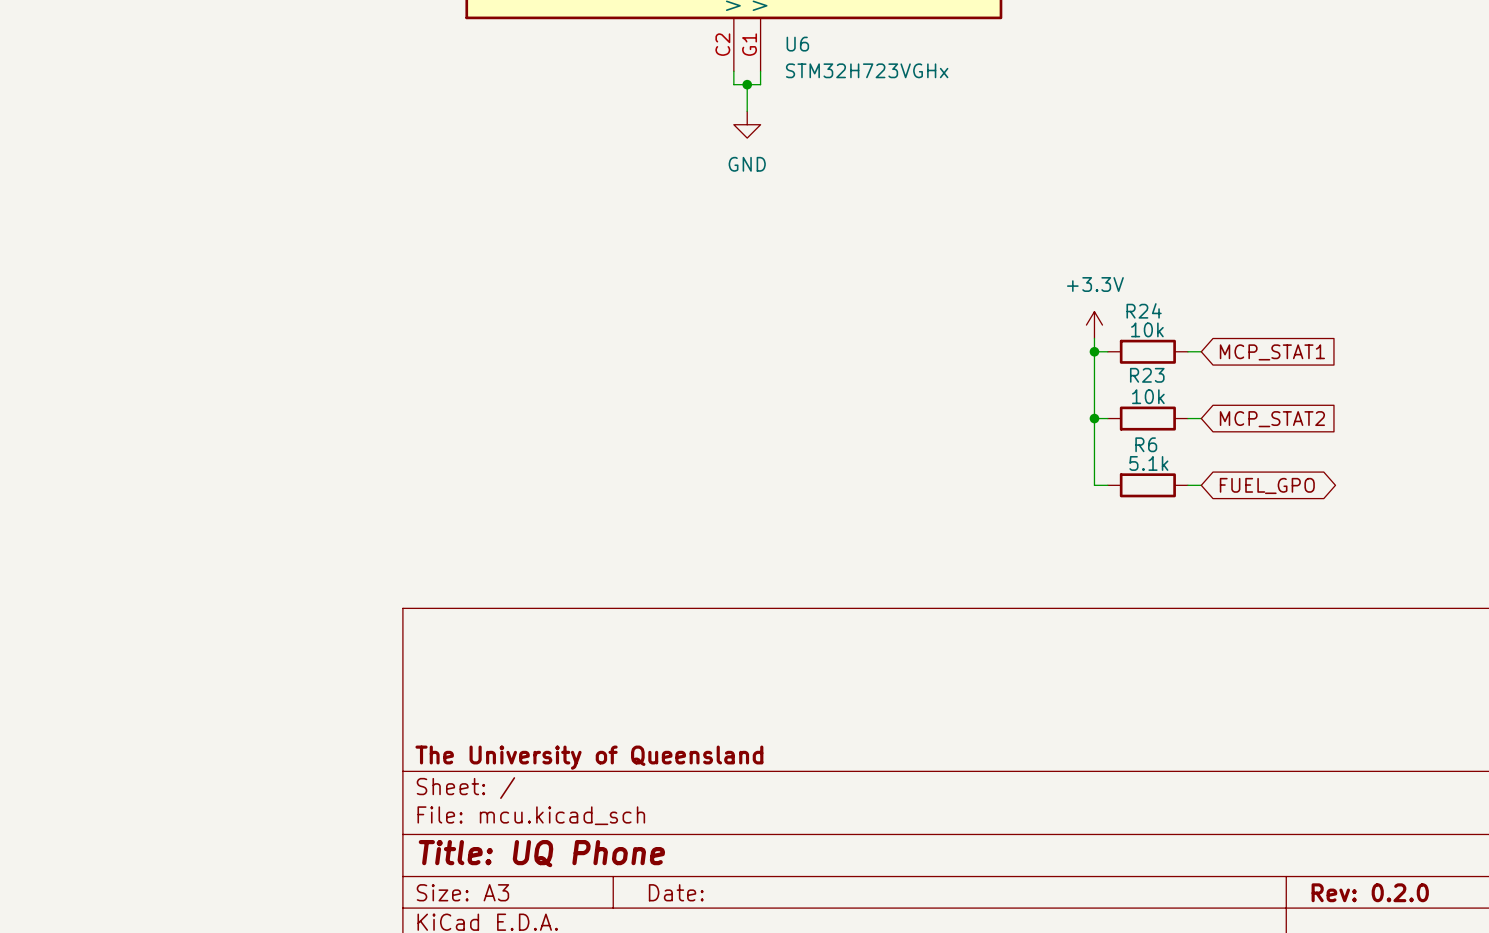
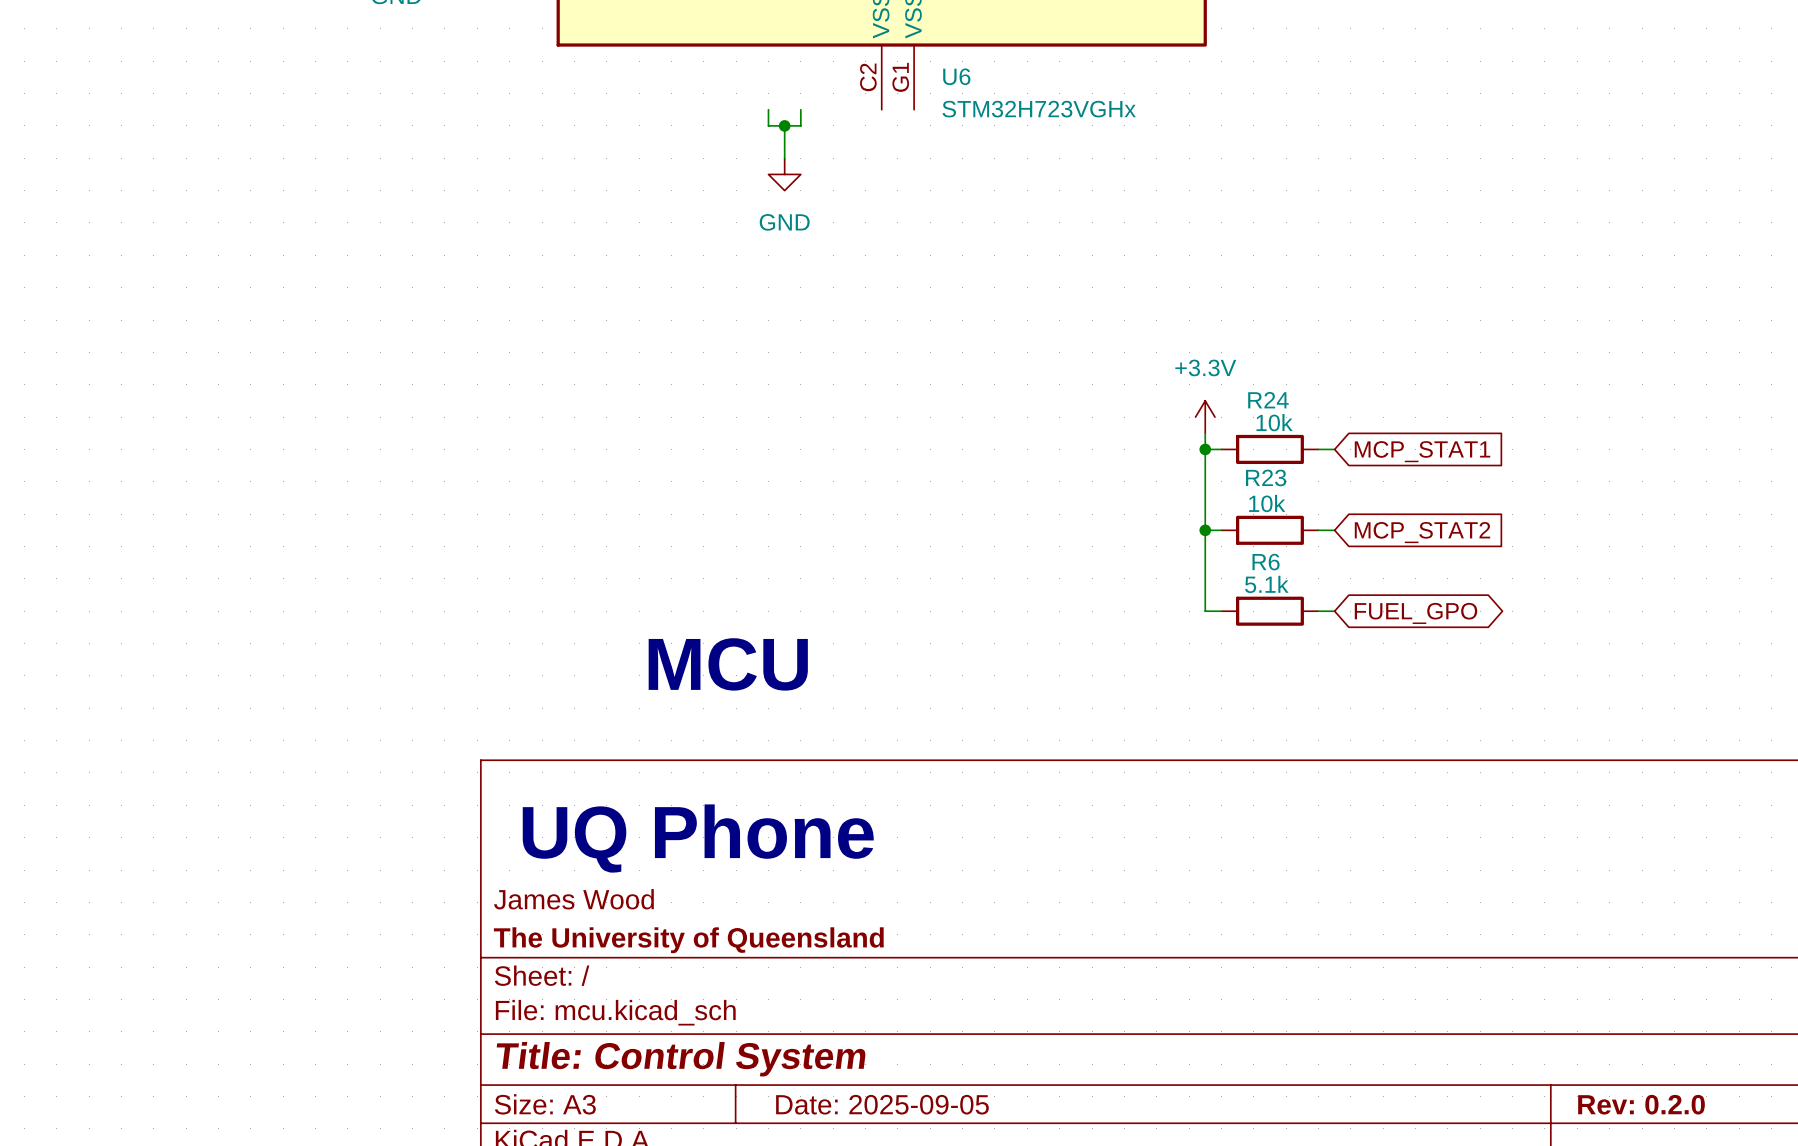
wire: (733, 71) (733, 84) (760, 84) (760, 71) -> (768, 109) (768, 125) (800, 125) (800, 109)
junction: none -> (784, 125)
wire: (747, 84) (747, 111) -> (784, 125) (784, 158)
junction: (747, 84) -> none
power symbol position: GND (747, 124) -> GND (784, 174)
power symbol position: +3.3V (1094, 325) -> +3.3V (1205, 417)
wire: none -> (1205, 433) (1205, 611) (1221, 611)
wire: (1094, 338) (1094, 485) -> none
junction: none -> (1205, 449)
junction: (1094, 351) -> none
R24 position: (1147, 351) -> (1269, 449)
wire: (1187, 351) (1201, 351) -> (1205, 449) (1221, 449)
global label position: MCP_STAT1 (1272, 352) -> MCP_STAT1 (1422, 451)
junction: none -> (1205, 530)
junction: (1094, 418) -> none
R23 position: (1147, 418) -> (1269, 530)
wire: (1187, 418) (1201, 418) -> (1205, 530) (1221, 530)
global label position: MCP_STAT2 (1272, 419) -> MCP_STAT2 (1422, 532)
R6 position: (1147, 485) -> (1269, 611)
wire: (1187, 485) (1201, 485) -> none
global label position: FUEL_GPO (1267, 485) -> FUEL_GPO (1416, 613)
text: none -> MCU (728, 664)
text: none -> UQ Phone (698, 838)
title block: none -> James Wood (573, 899)
title block: Title: UQ Phone (541, 853) -> Title: Control System (681, 1059)
title block: Date: (676, 892) -> Date: 2025-09-05 (882, 1104)

